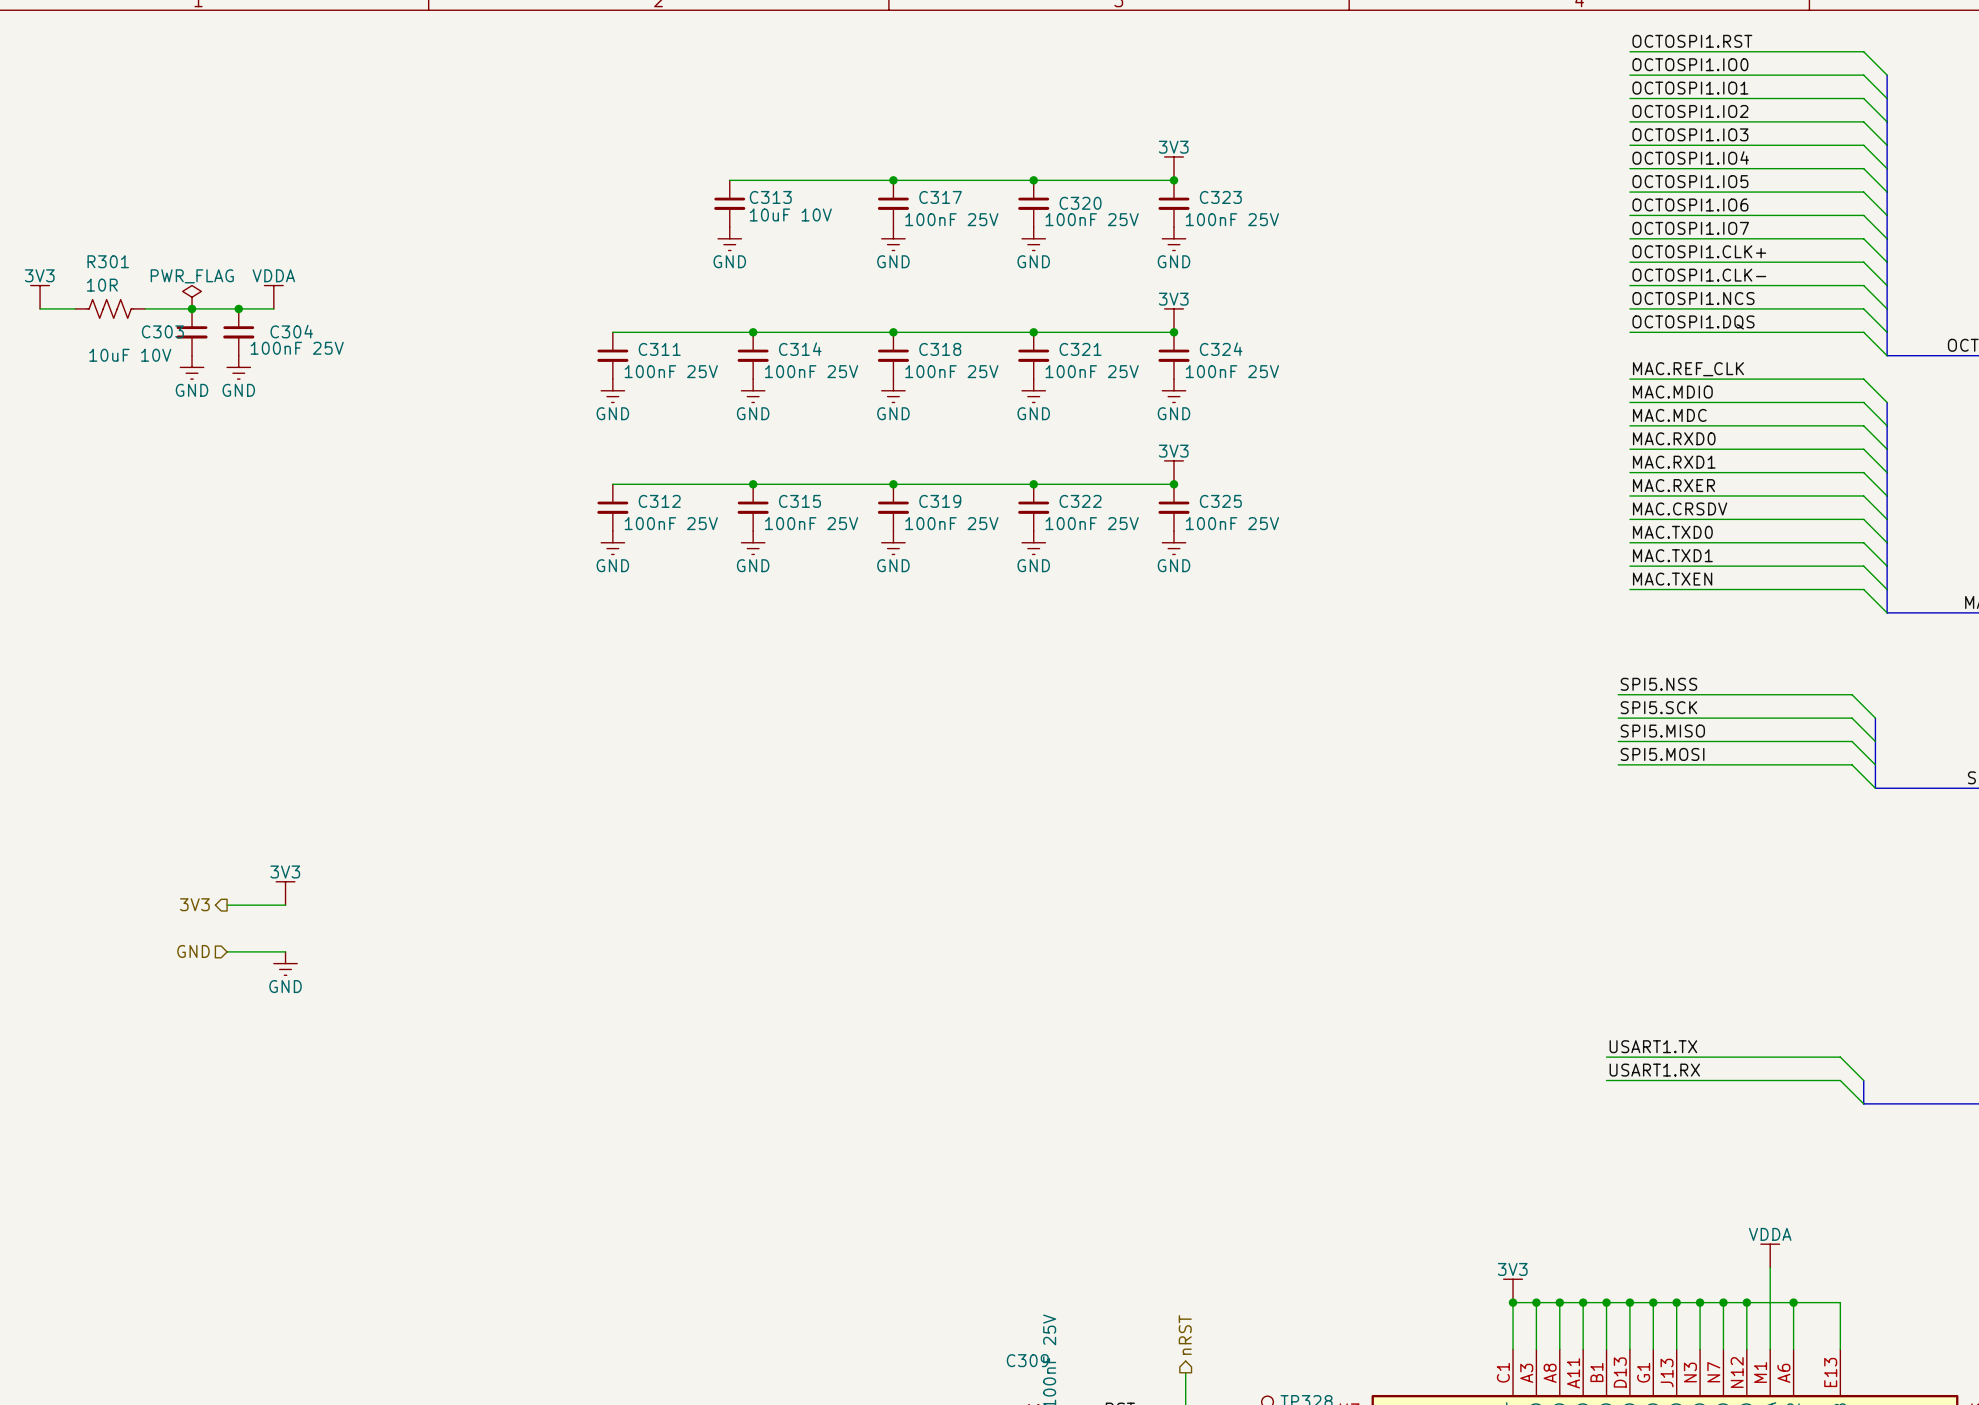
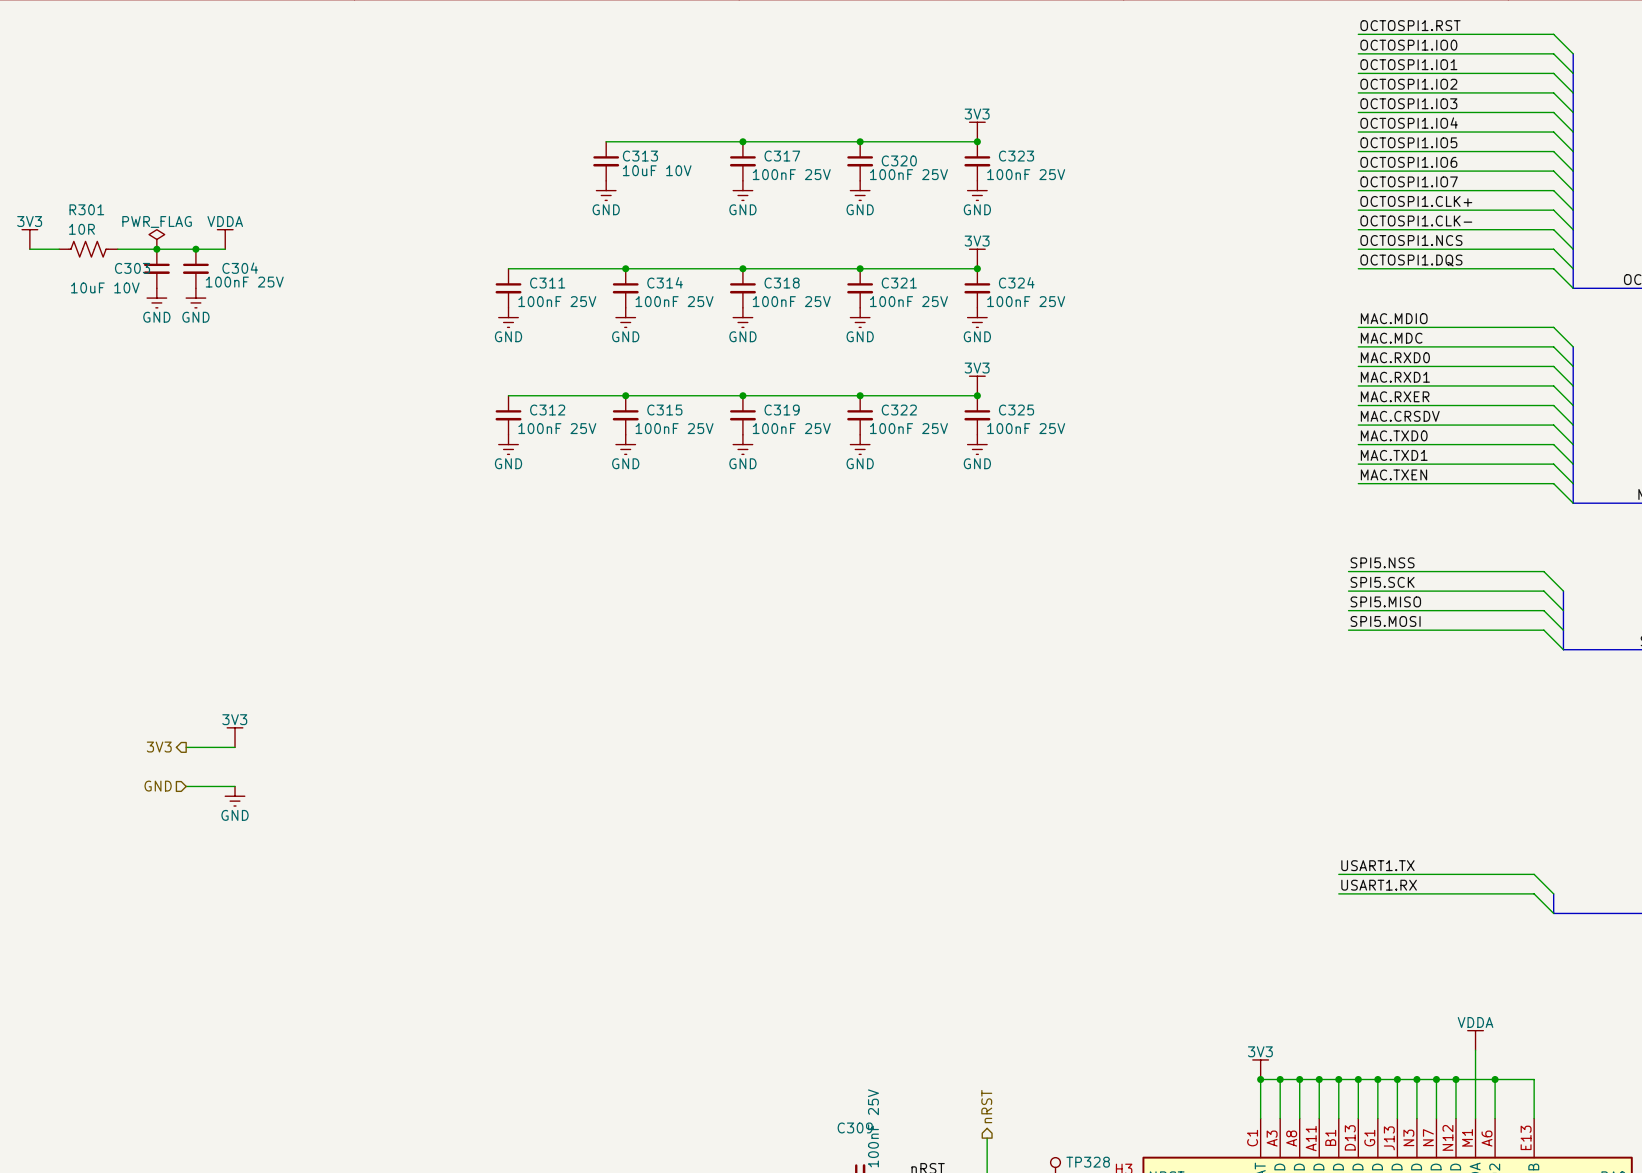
label: MAC.REF_CLK (1688, 369) -> none
wire: (1629, 379) (1863, 379) (1887, 402) -> none
bus: (1887, 402) (1887, 425) -> none

